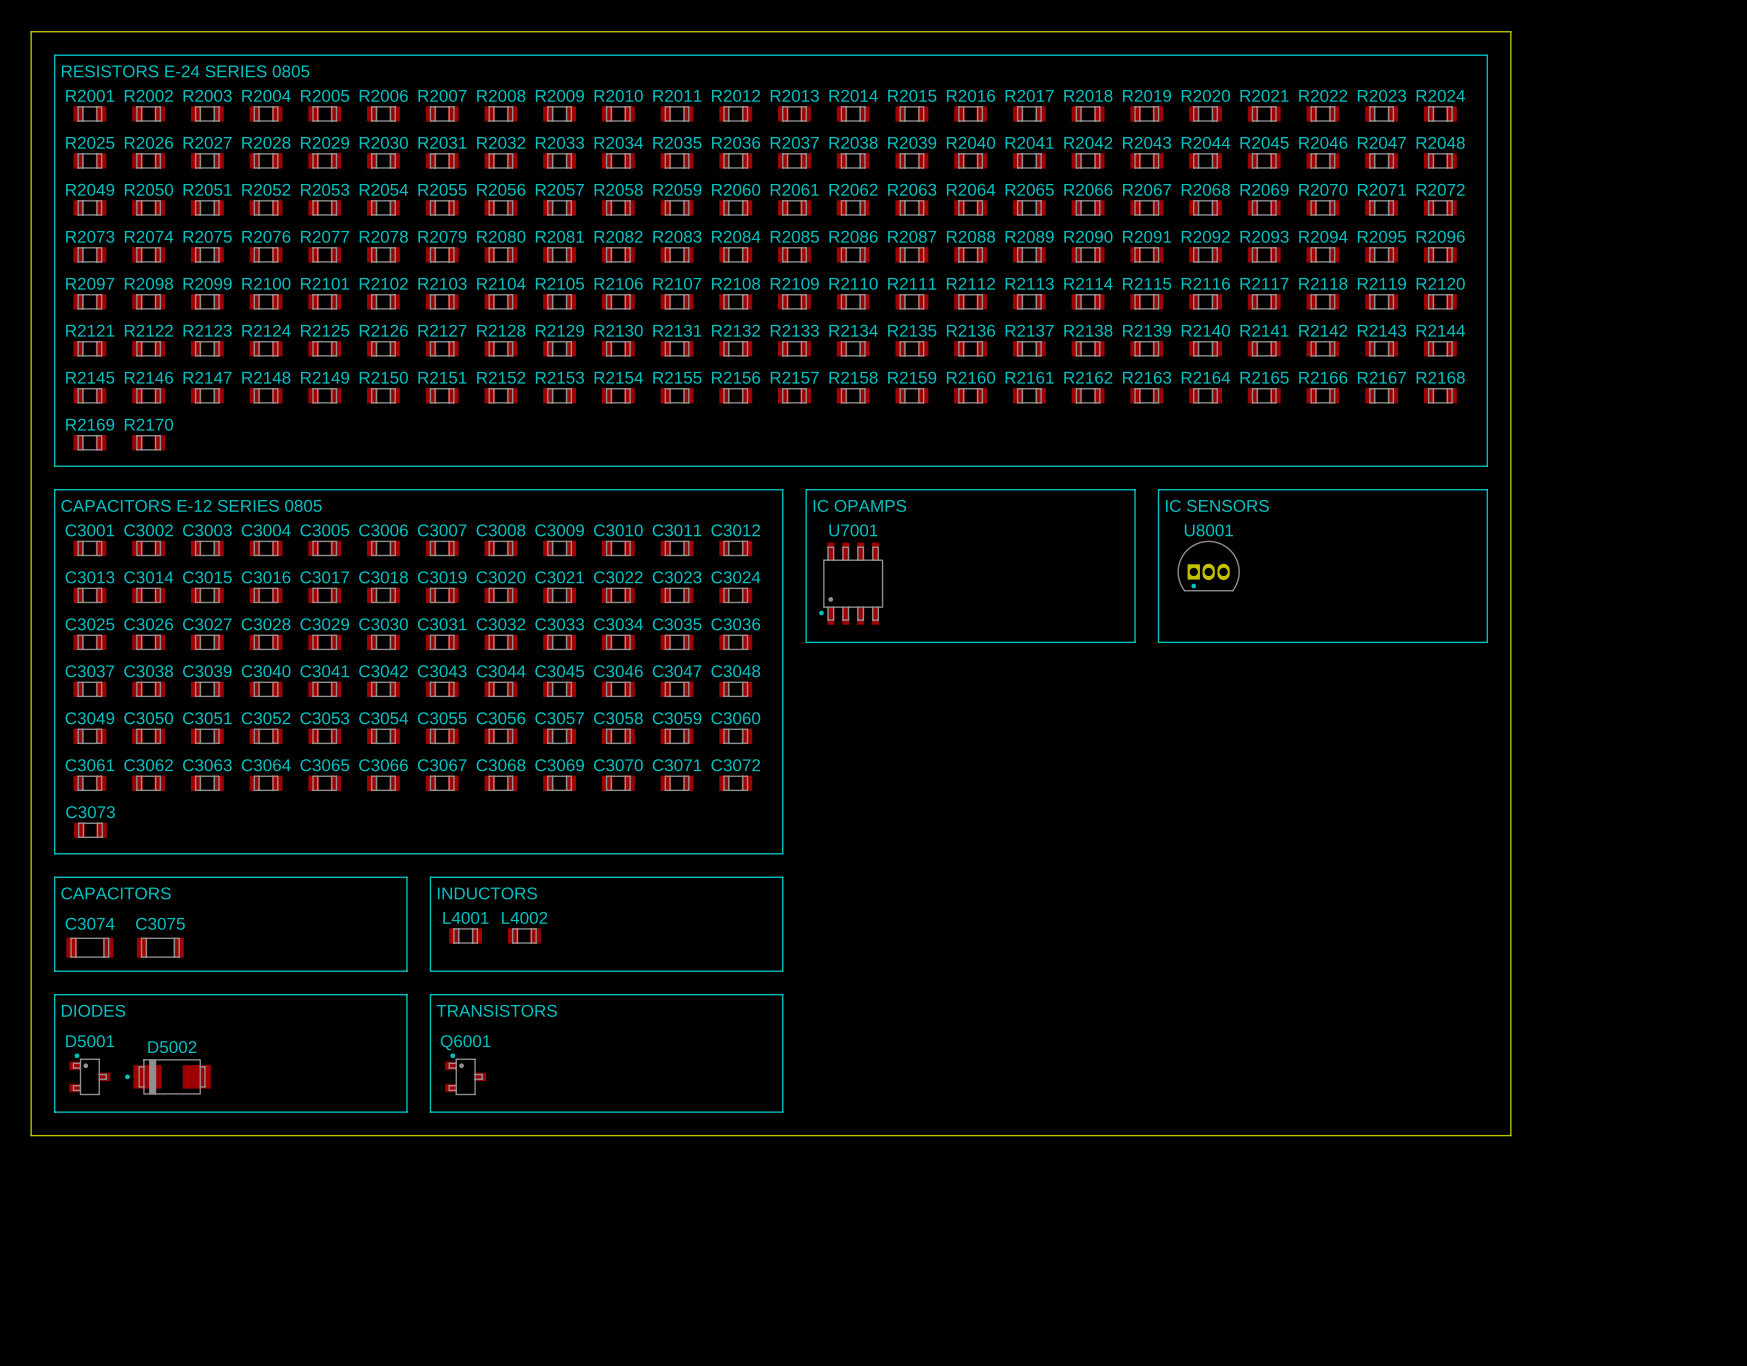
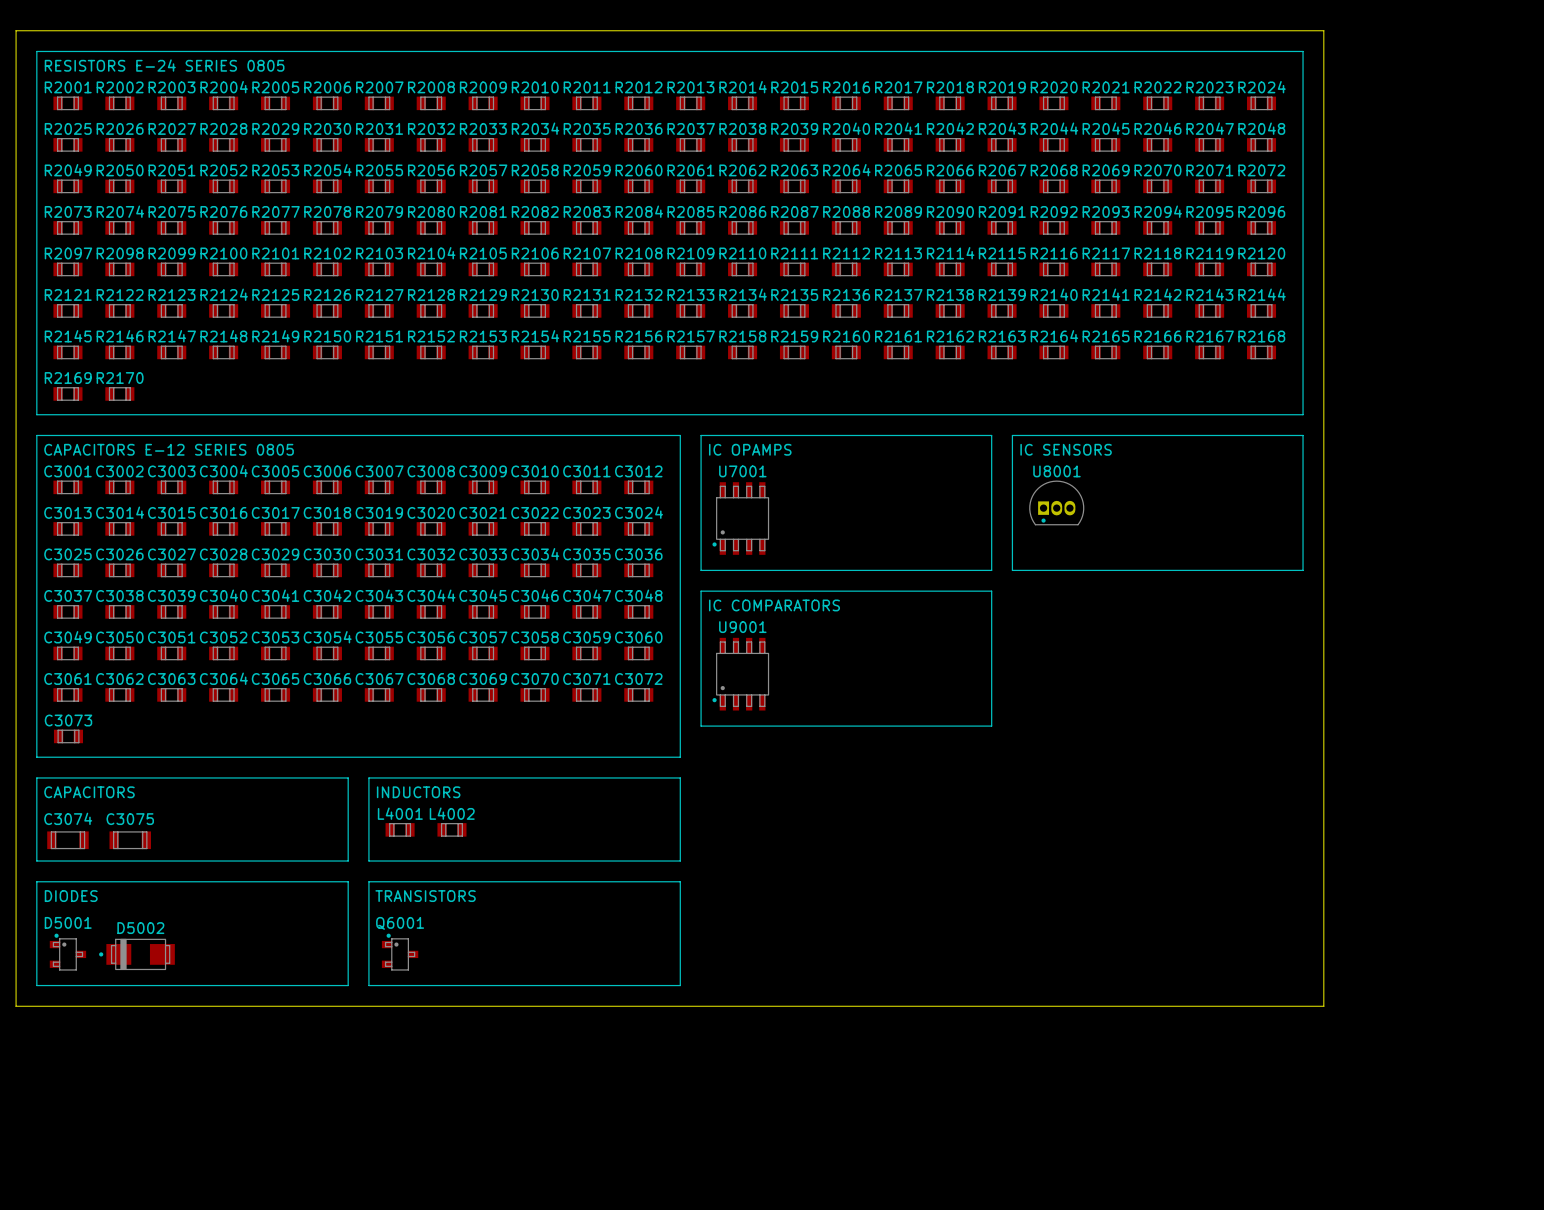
line: none -> (701, 591) (991, 591) (991, 726) (701, 726) (701, 591)
text: none -> IC COMPARATORS (774, 605)
U9001: none -> (740, 674)

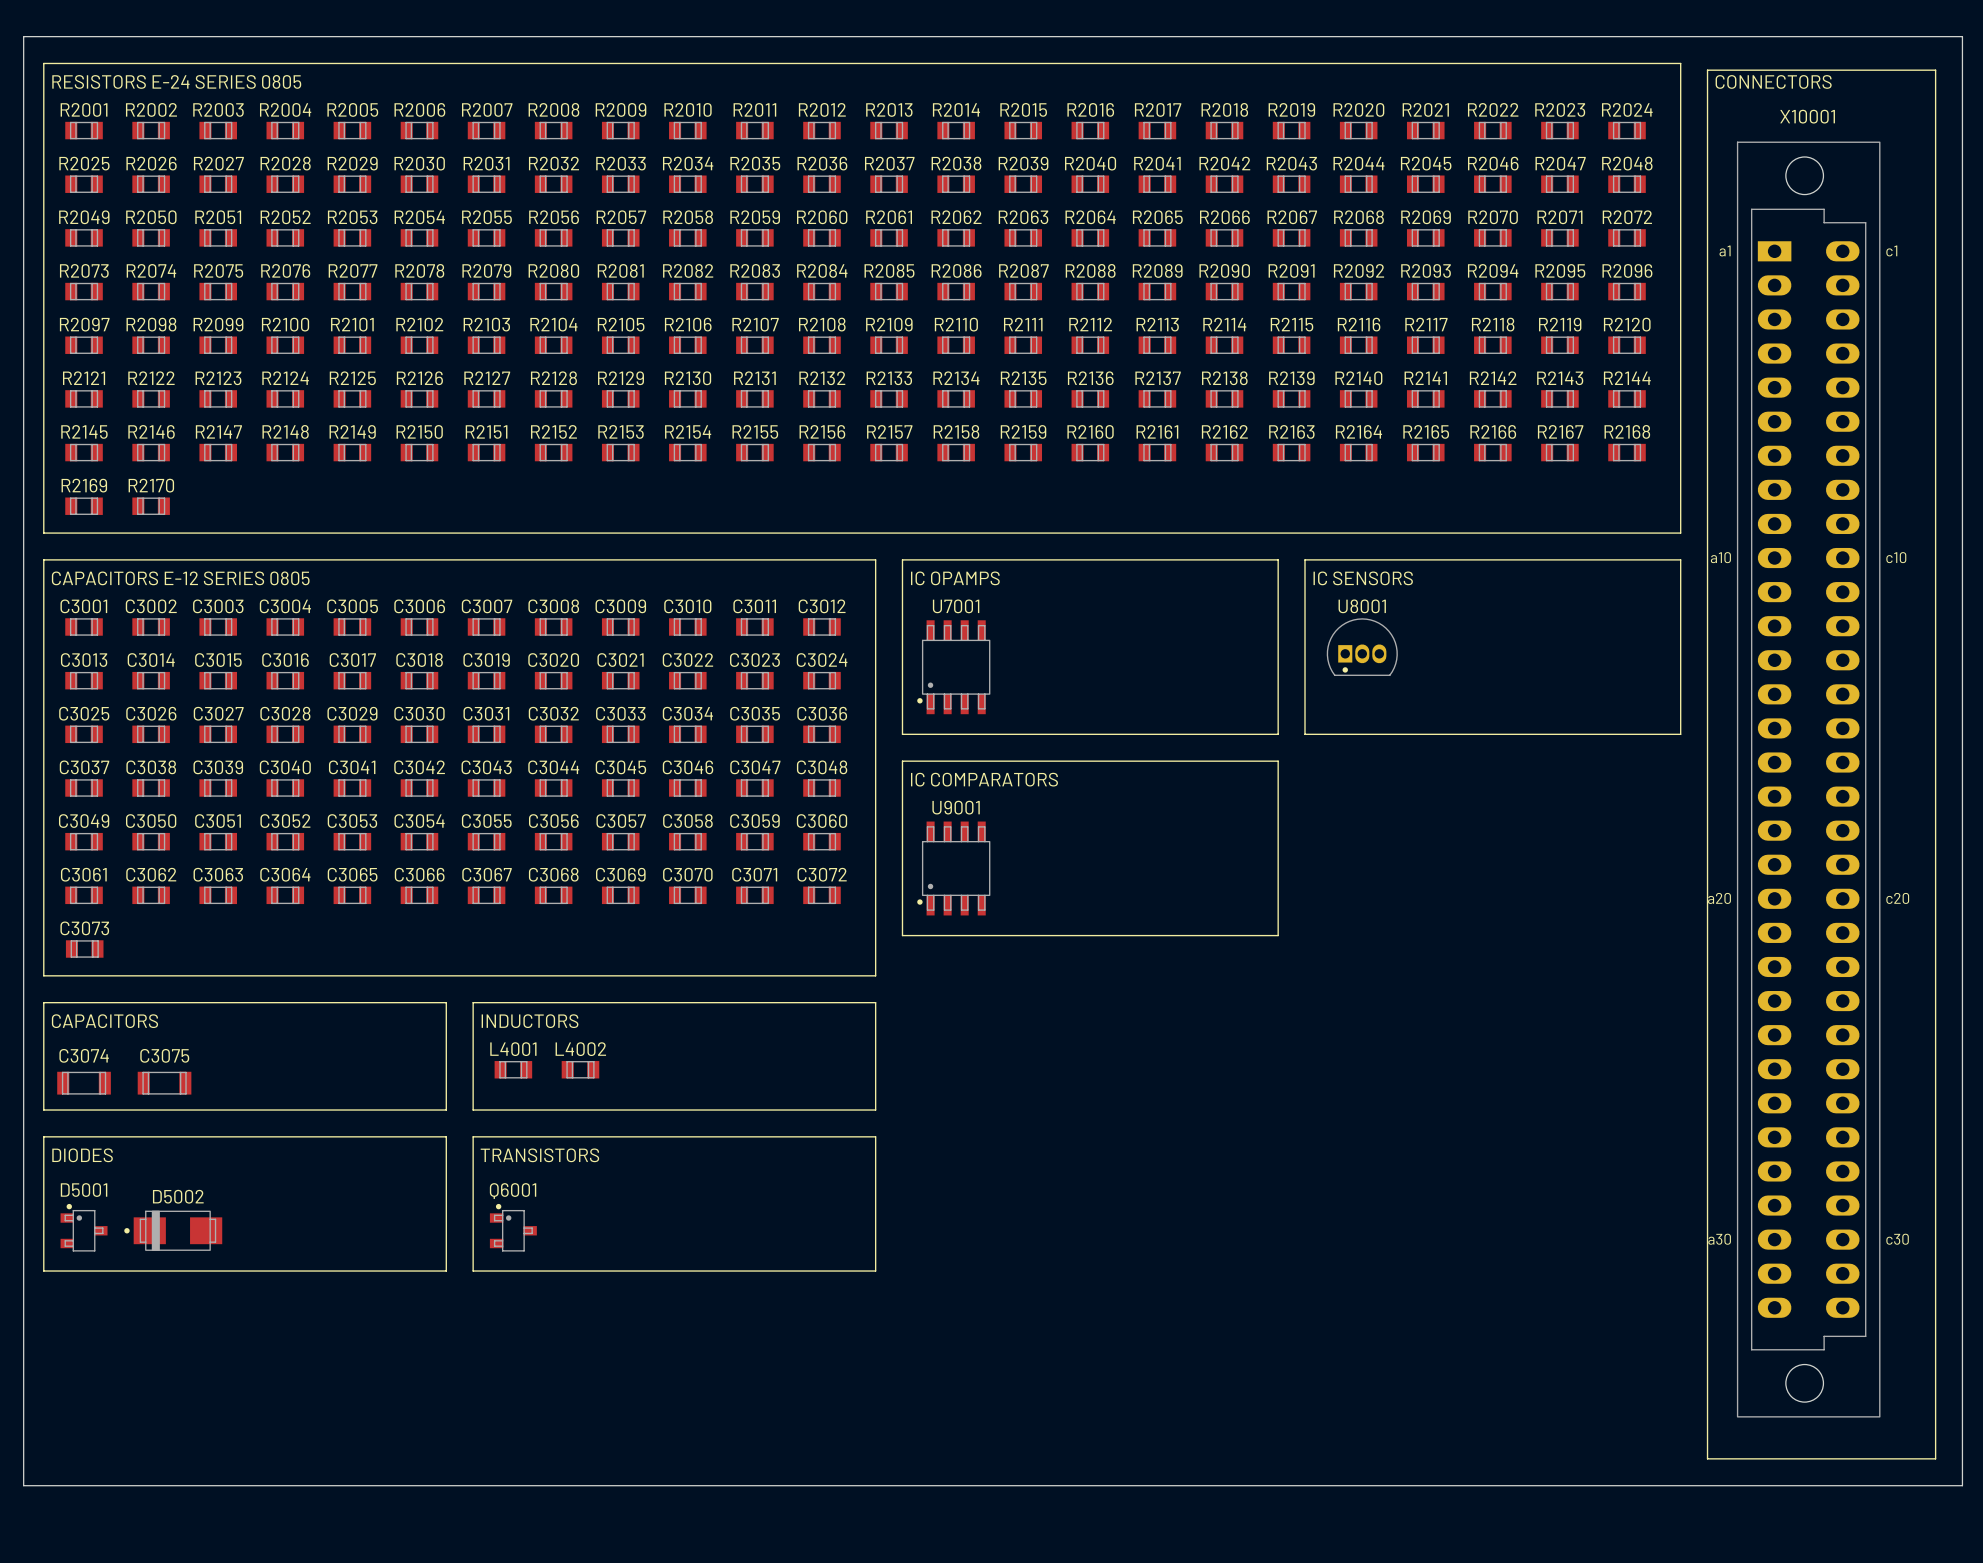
board edge: (21, 30) (16, 30) (16, 1006) (1323, 1006) (1323, 30) -> (23, 36) (23, 1485) (1962, 1485) (1962, 36) (1707, 36)
line: none -> (1707, 70) (1935, 70) (1935, 1458) (1707, 1458) (1707, 70)
text: none -> CONNECTORS (1773, 81)
X10001: none -> (1808, 779)

